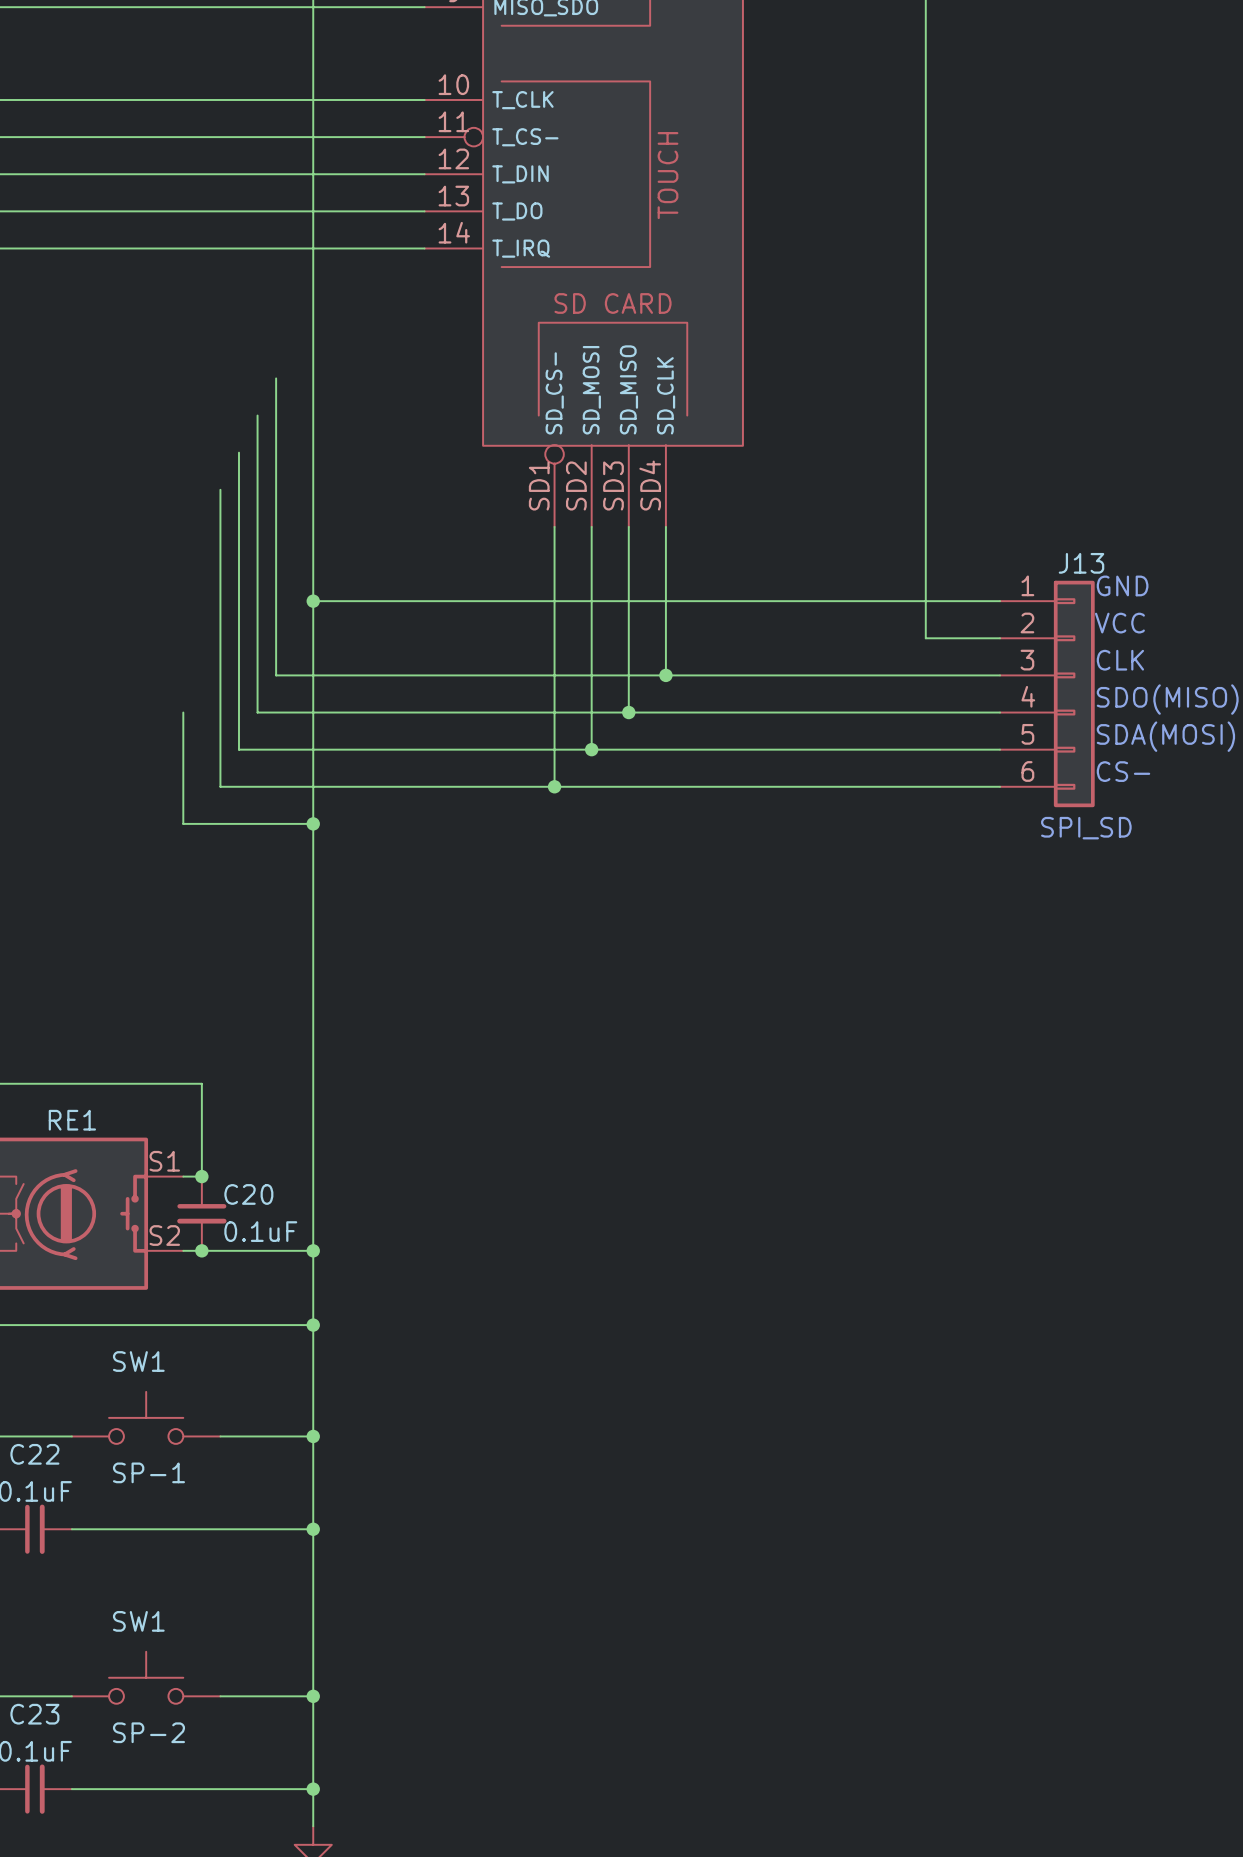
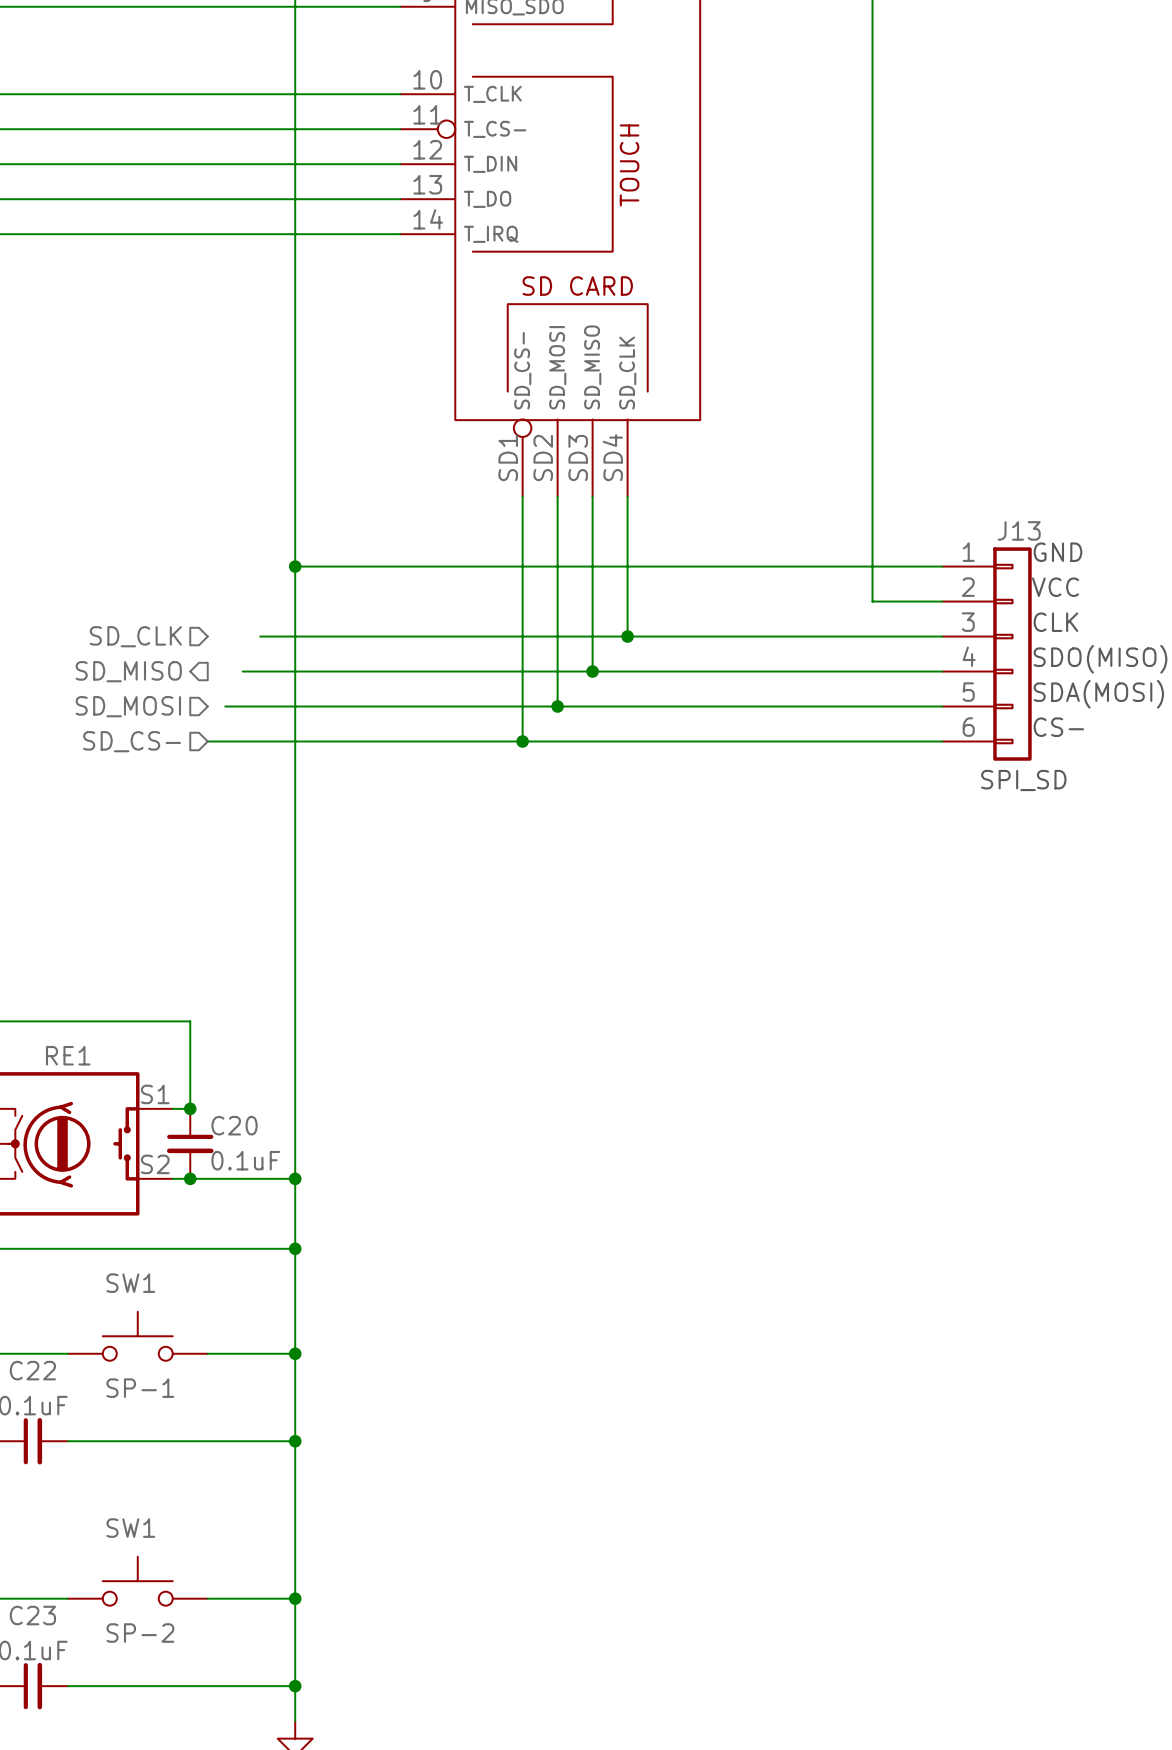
wire: (276, 378) (276, 675) -> none
wire: (257, 415) (257, 712) -> none
wire: (238, 452) (238, 749) -> none
wire: (220, 489) (220, 786) -> none
hierarchical label: none -> SD_CLK (135, 636)
hierarchical label: none -> SD_MISO (128, 671)
wire: (183, 712) (183, 823) (313, 823) -> none
hierarchical label: none -> SD_MOSI (128, 706)
hierarchical label: none -> SD_CS- (132, 741)
junction: (313, 823) -> none

